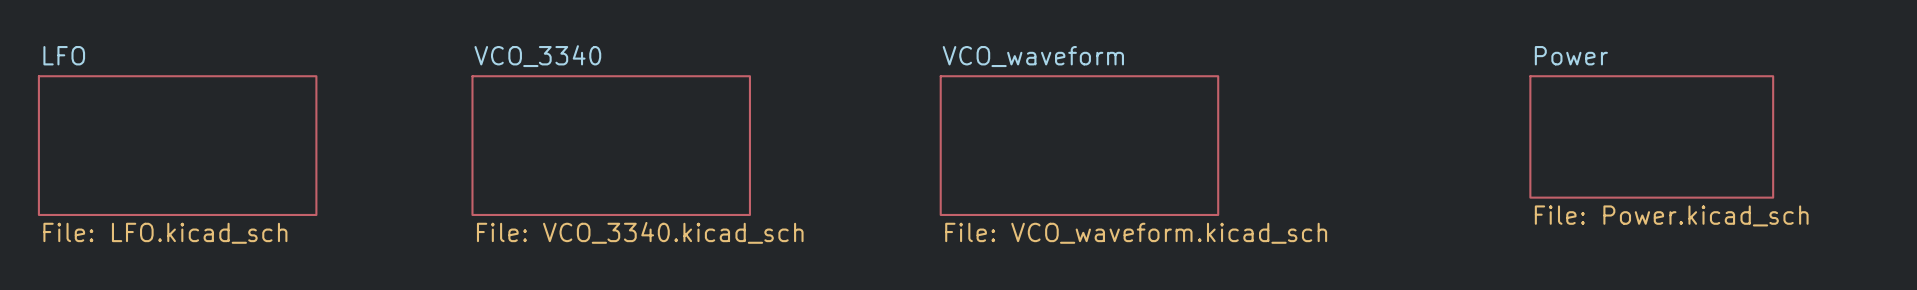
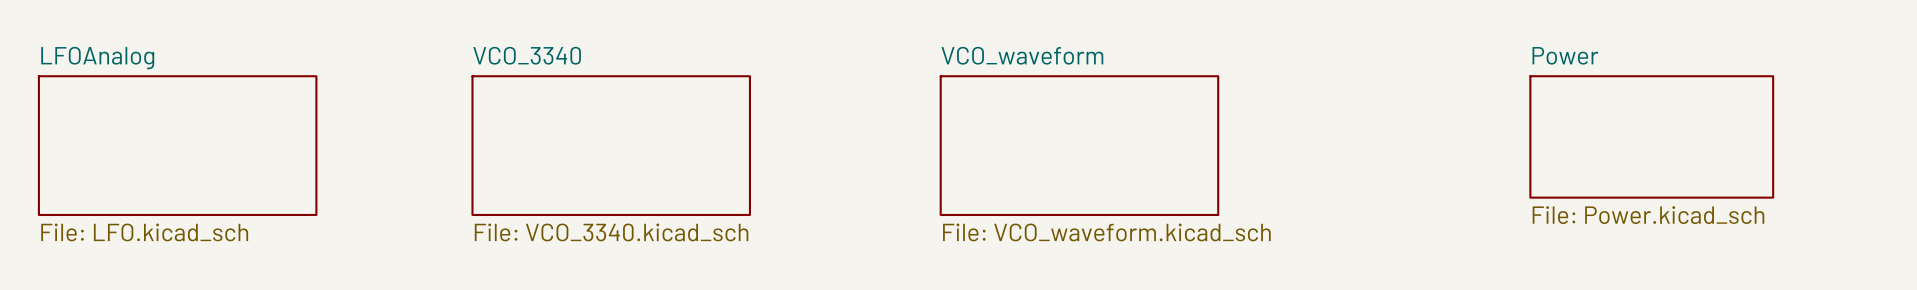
sheet LFO name: LFO (64, 55) -> LFOAnalog (97, 58)

